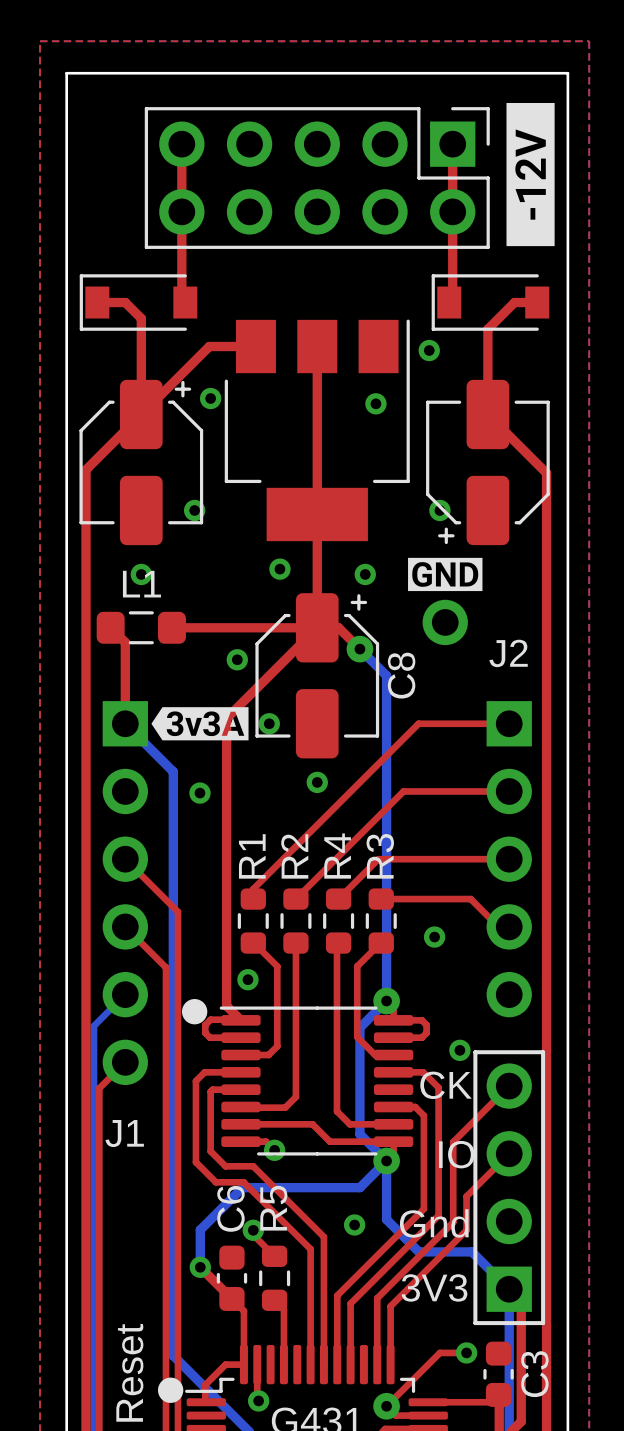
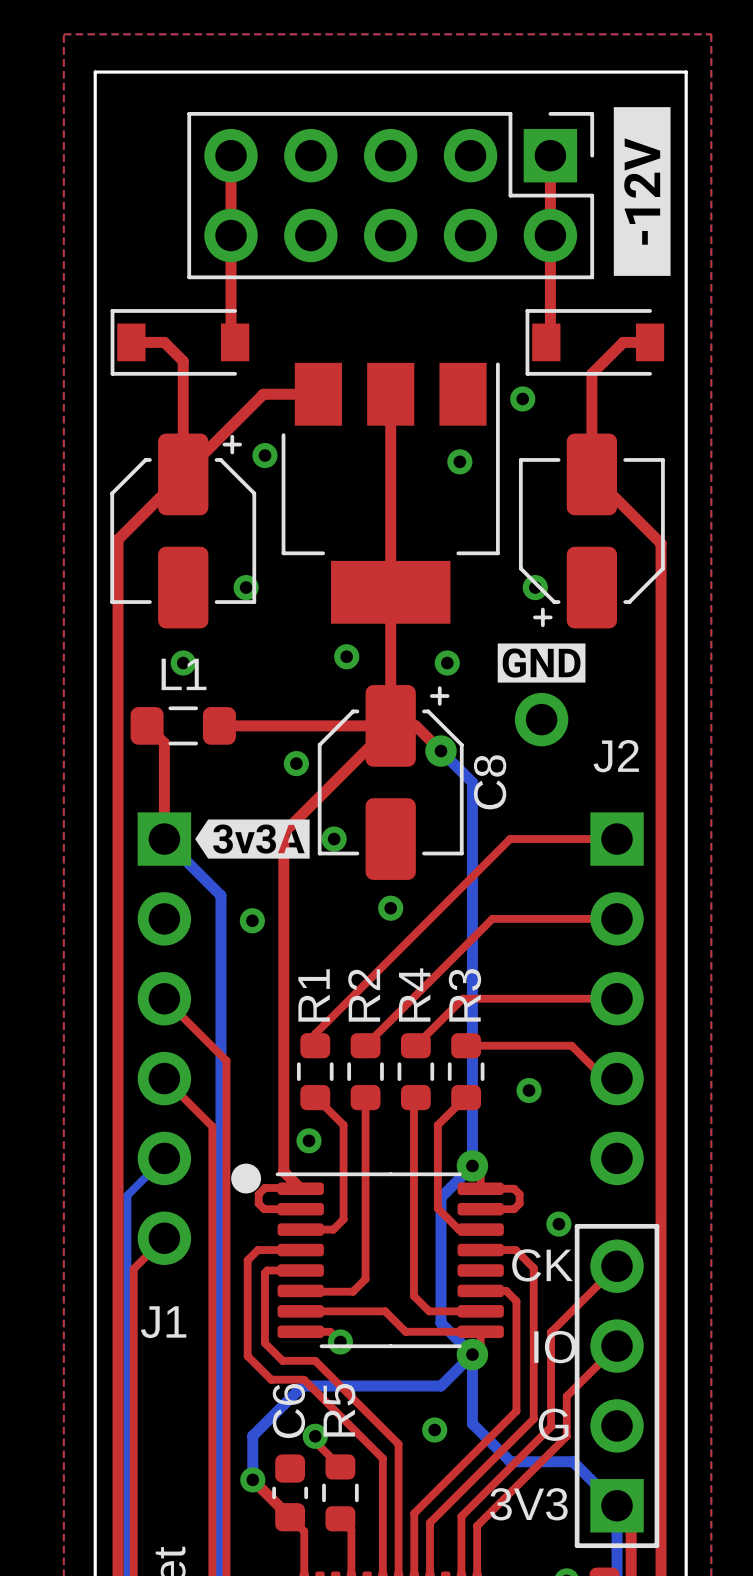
part text: none -> G (553, 1424)
part text: Gnd (434, 1223) -> none

